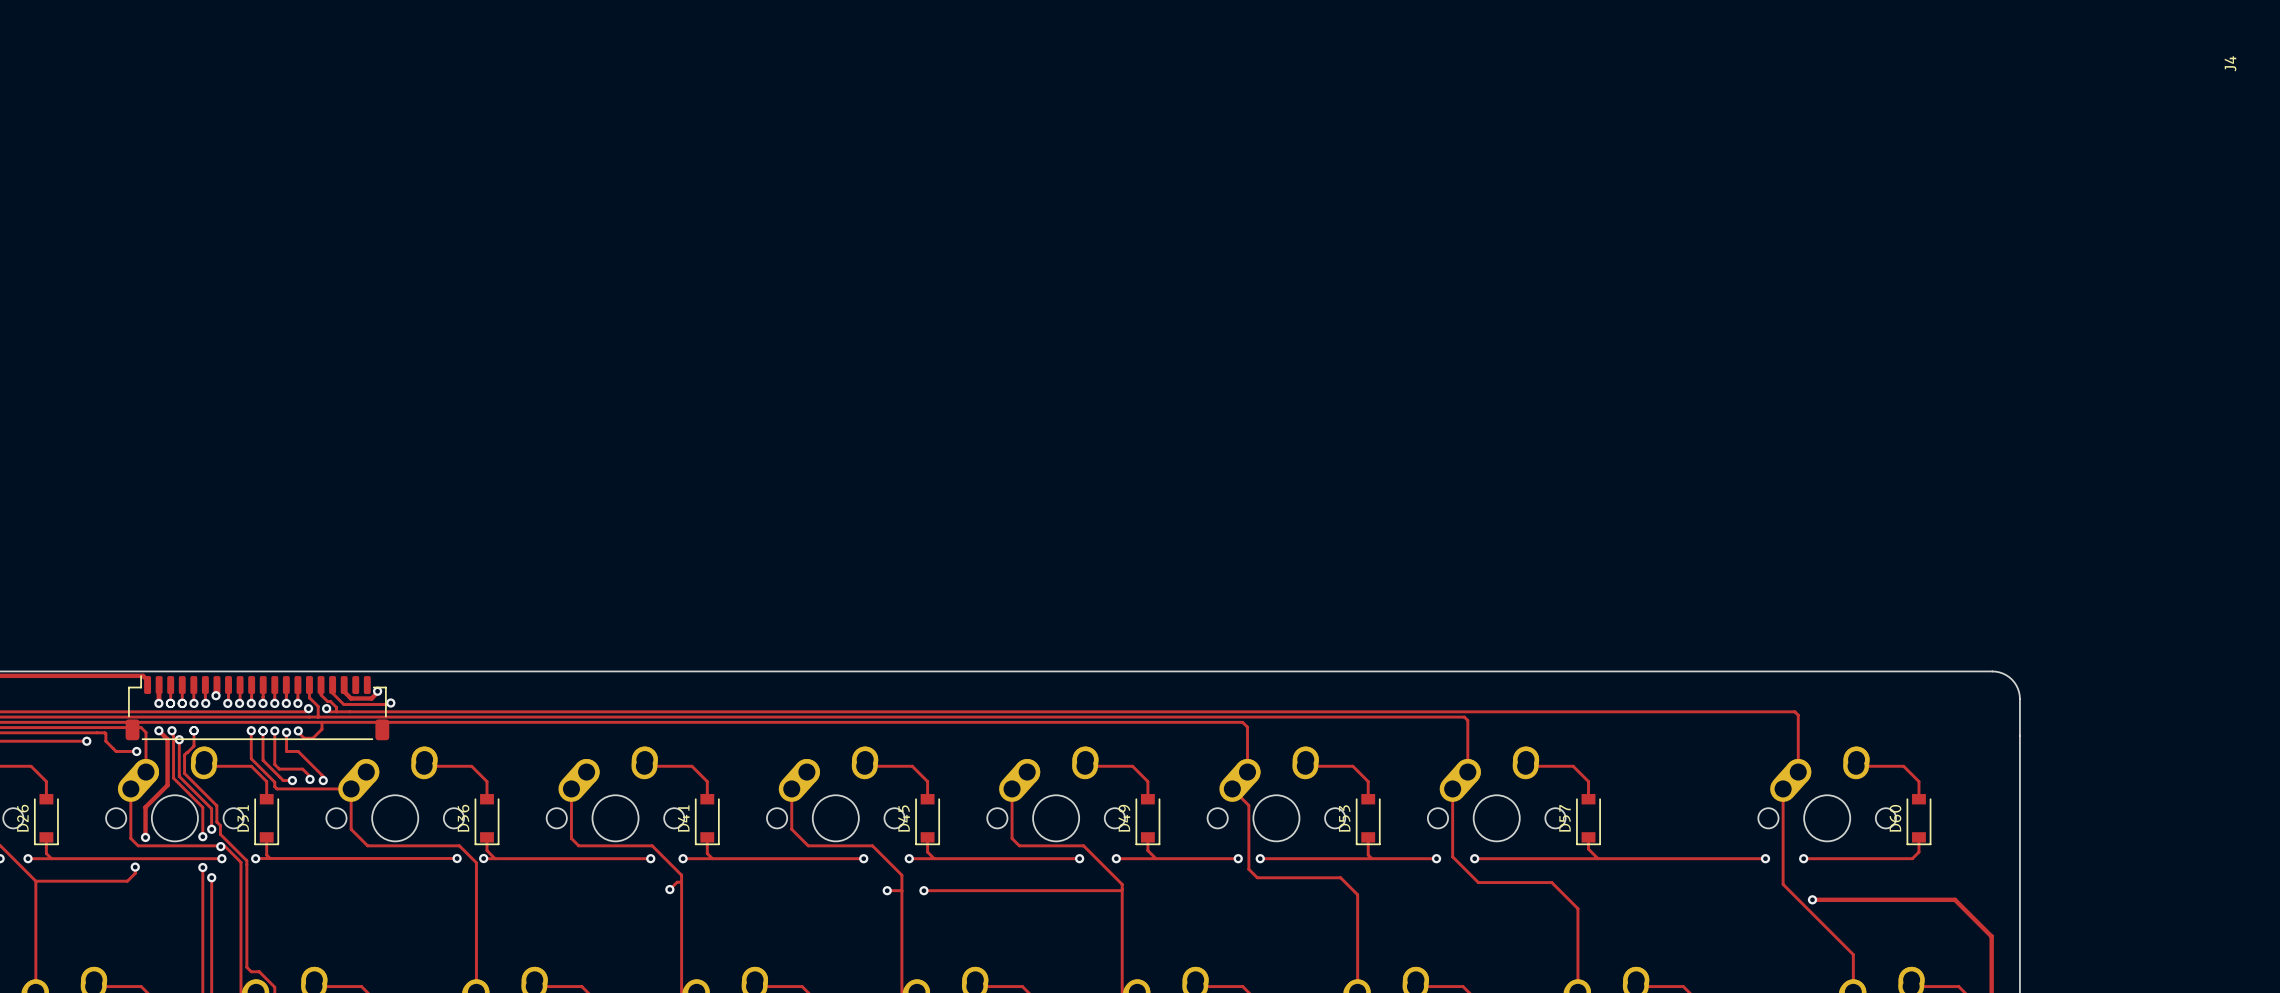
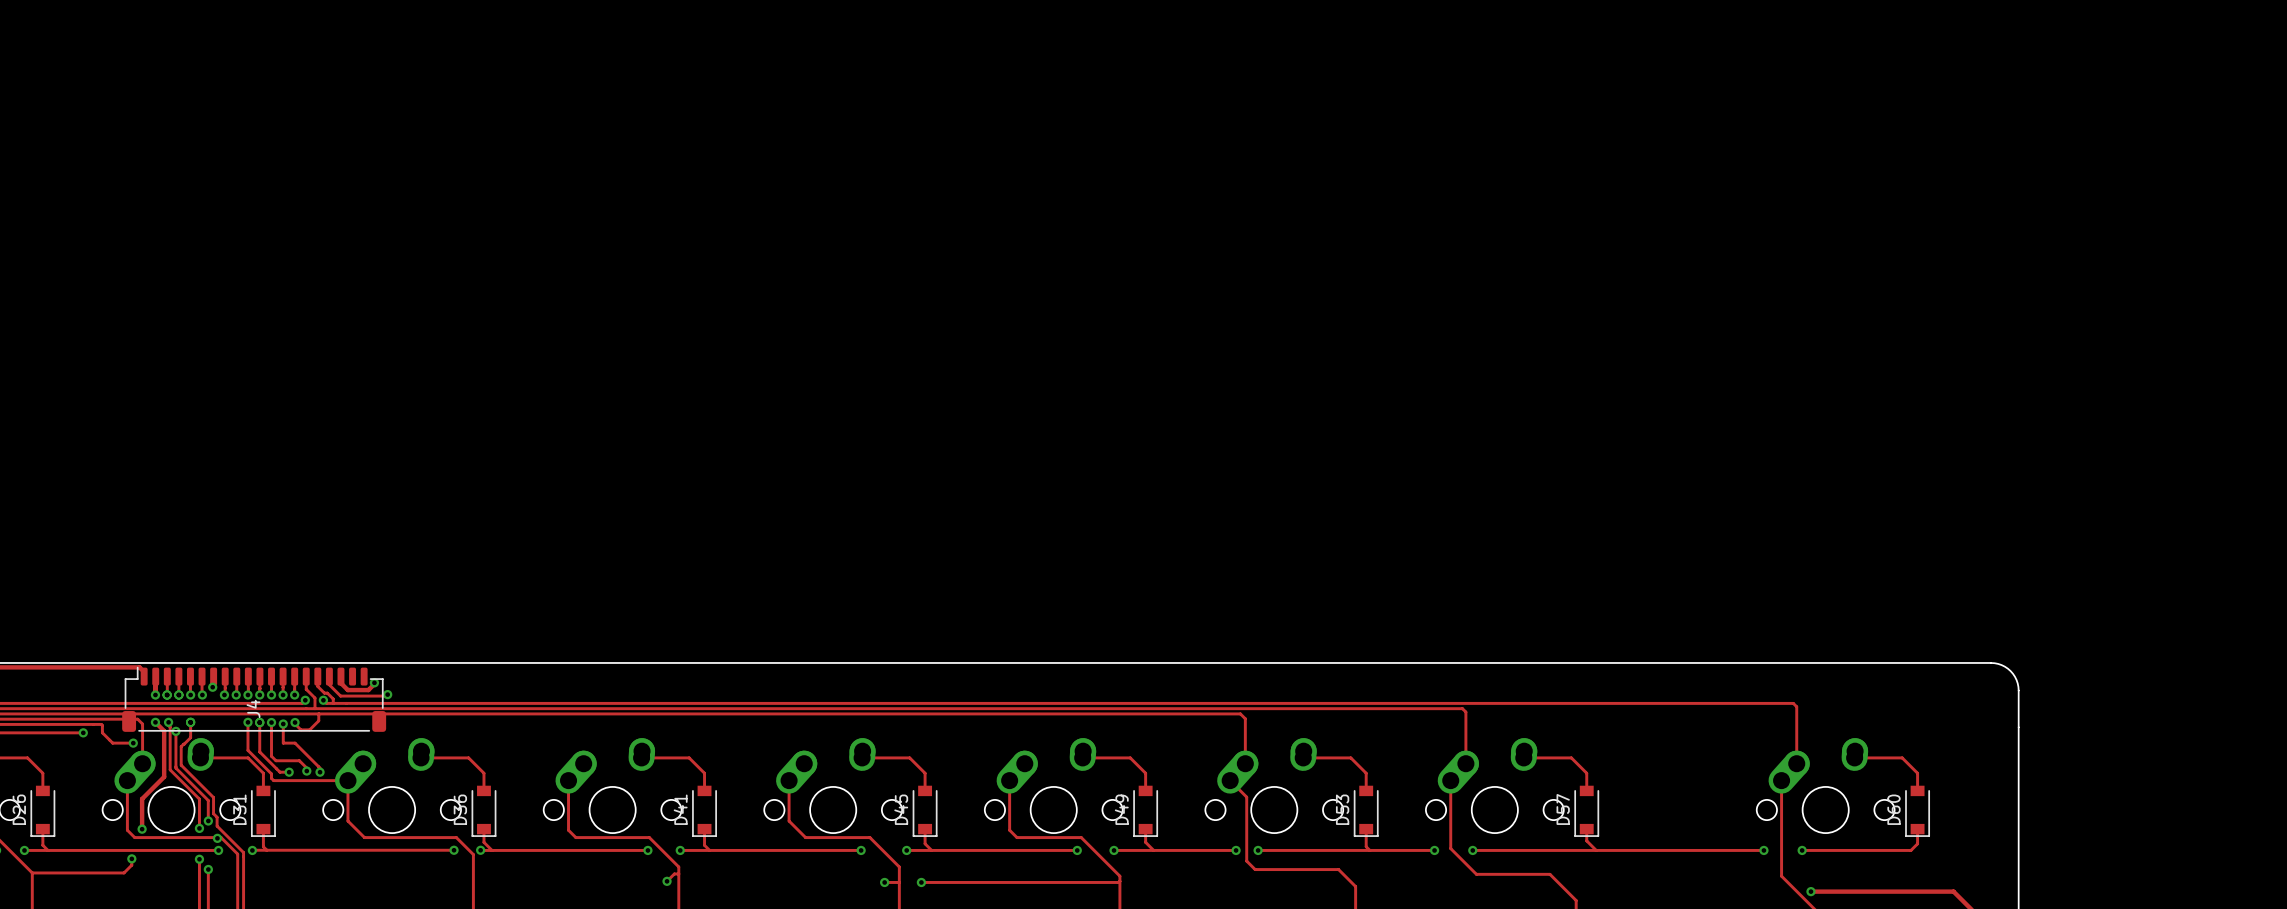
J4 name position: J4 (2230, 63) -> J4 (253, 708)

